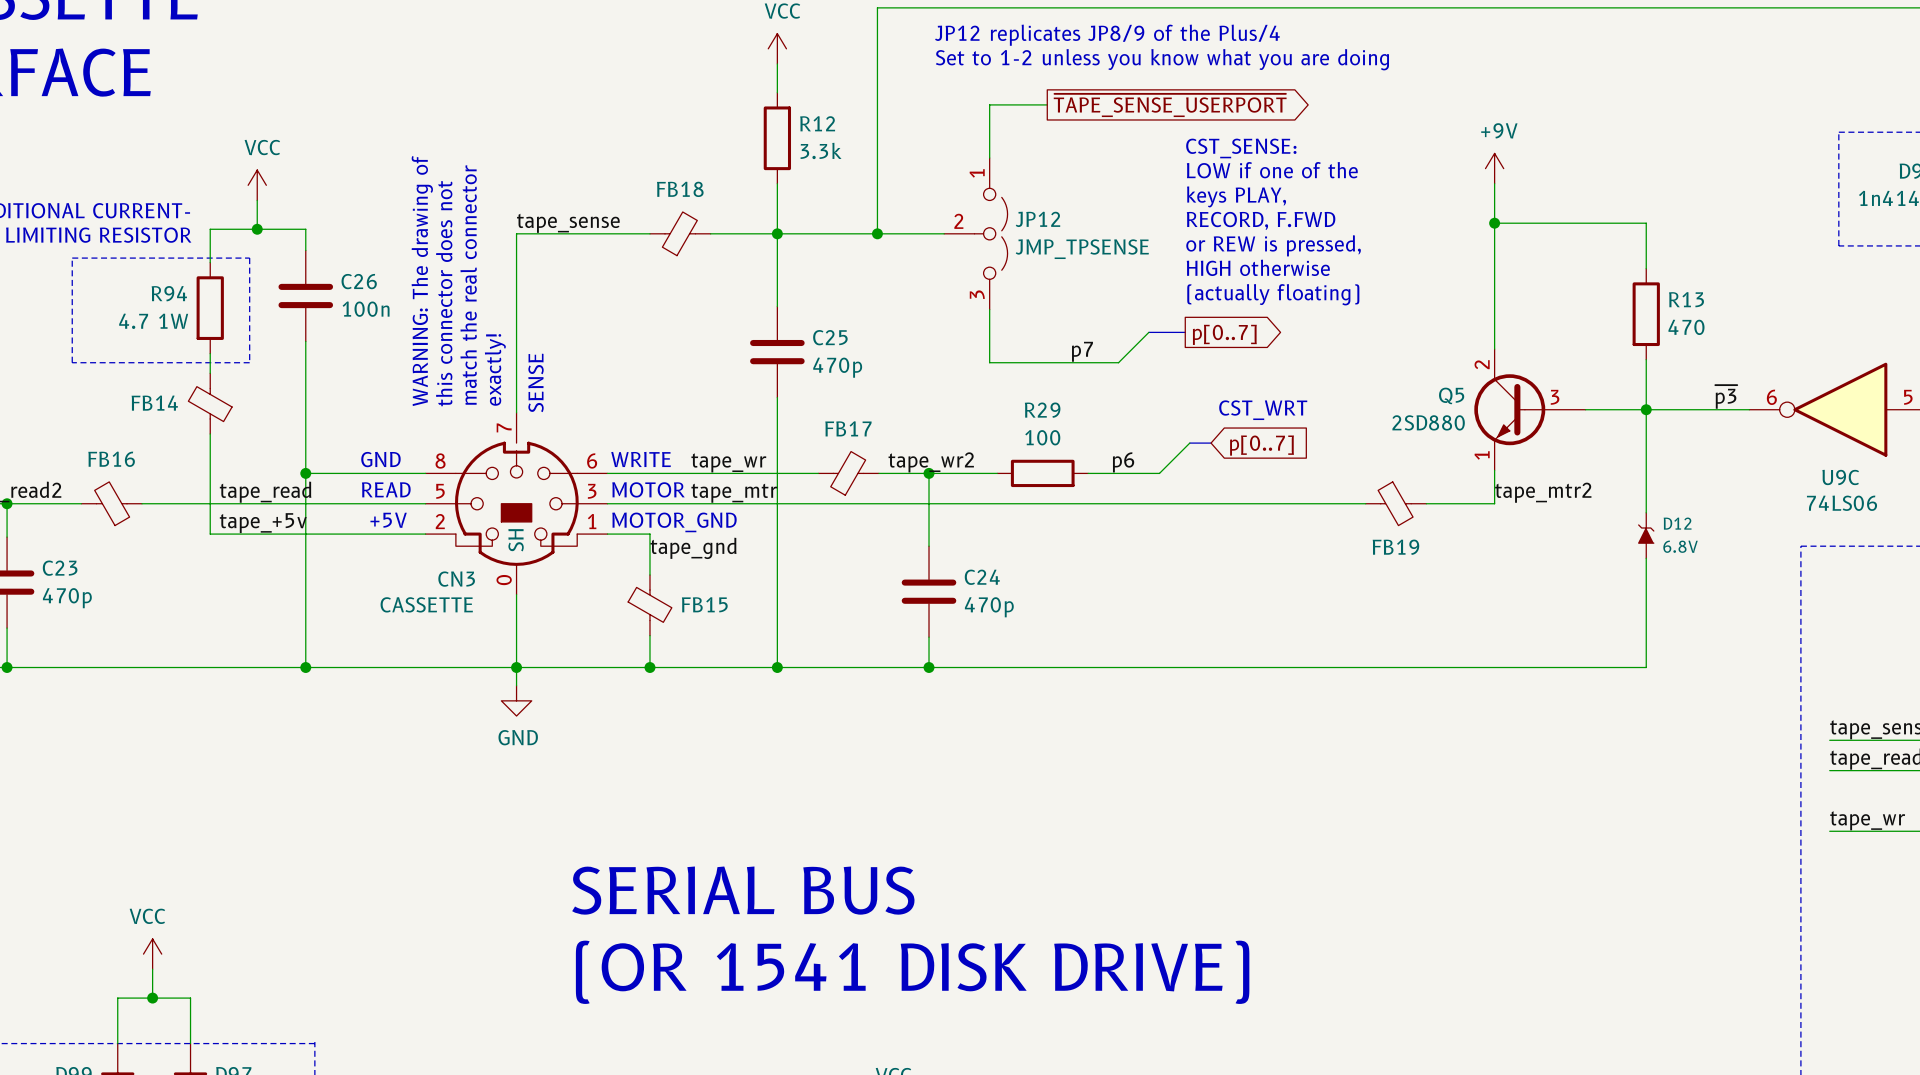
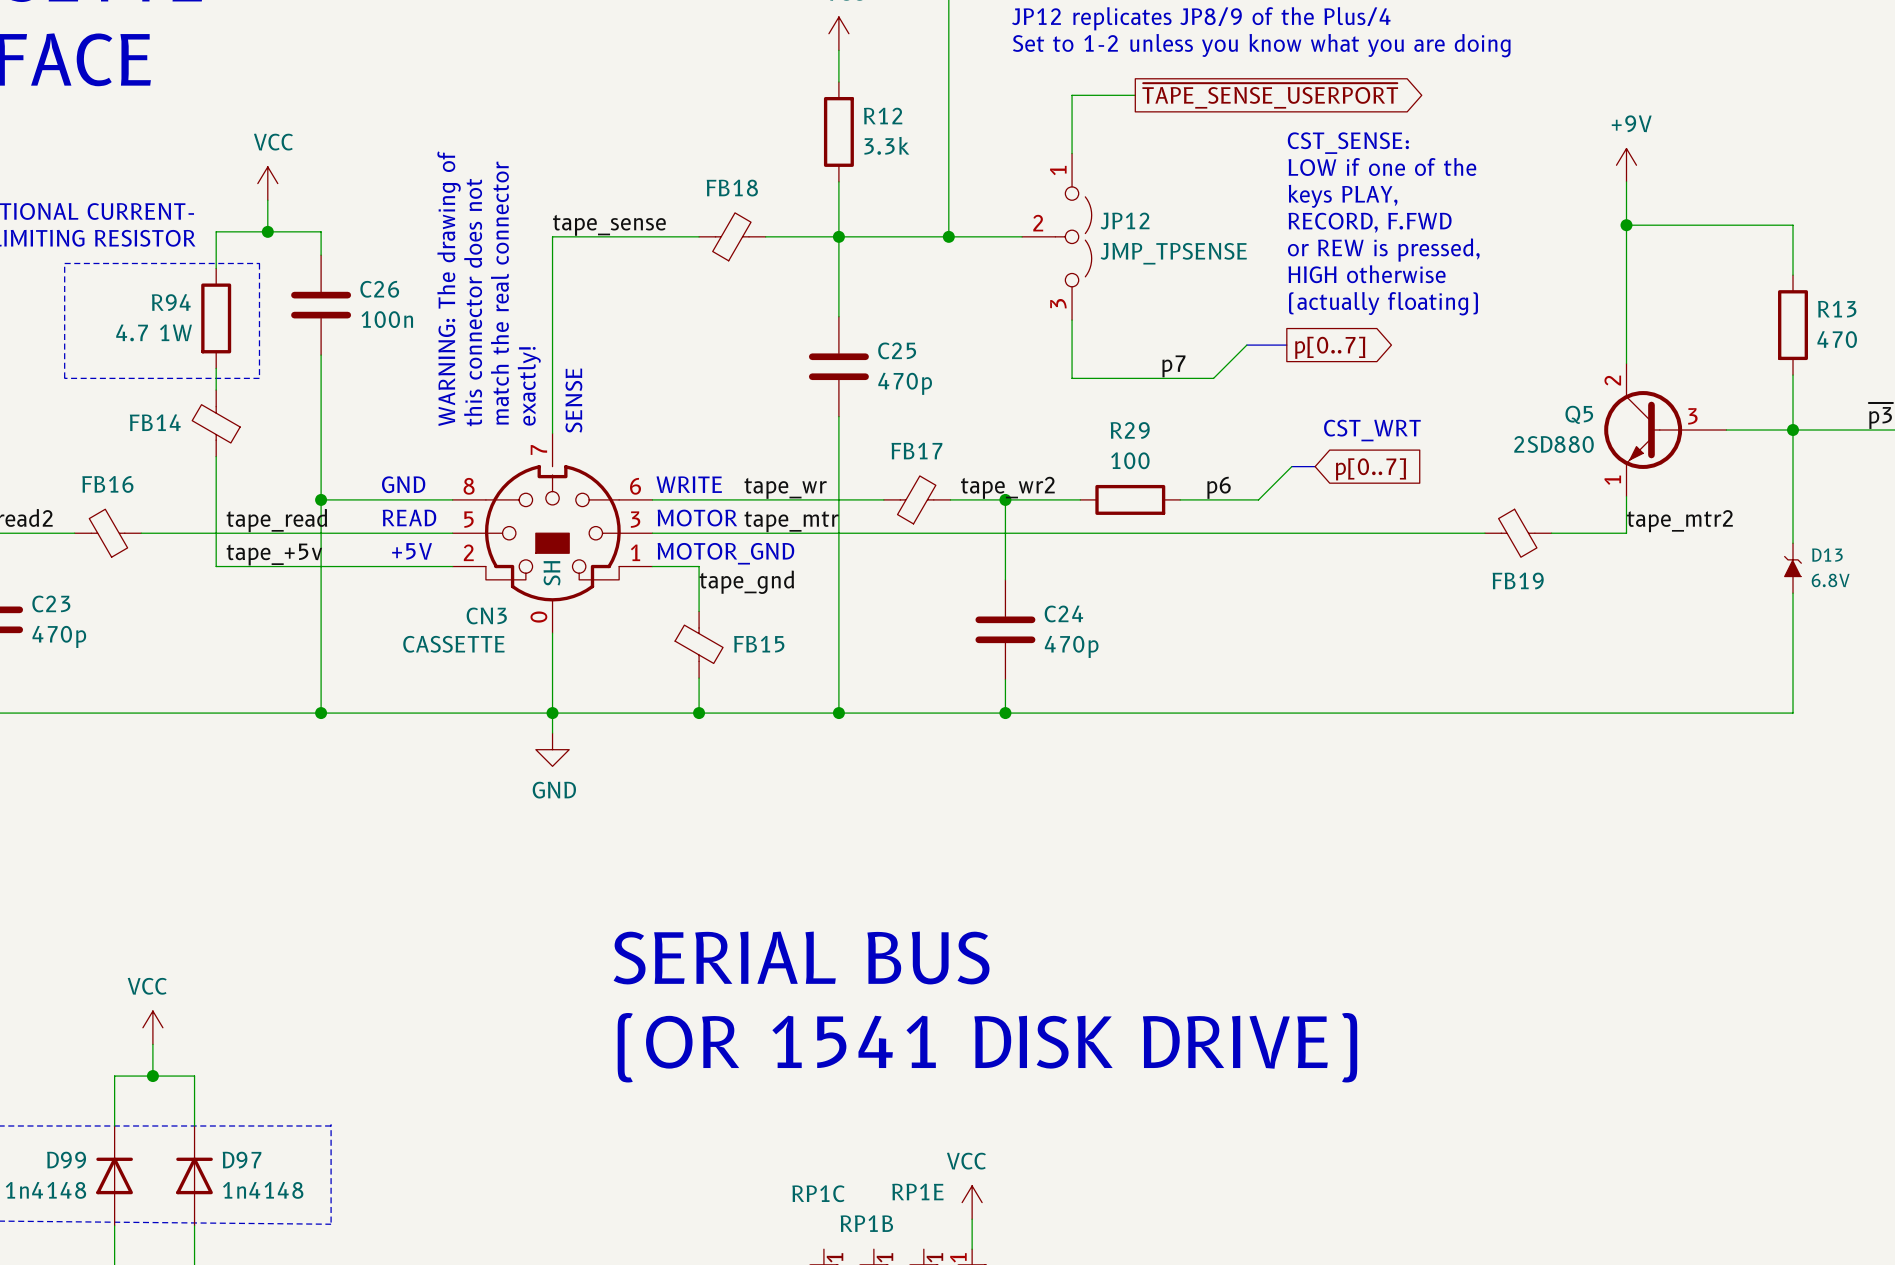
D12 name: D12 (1677, 523) -> D13 (1827, 555)

